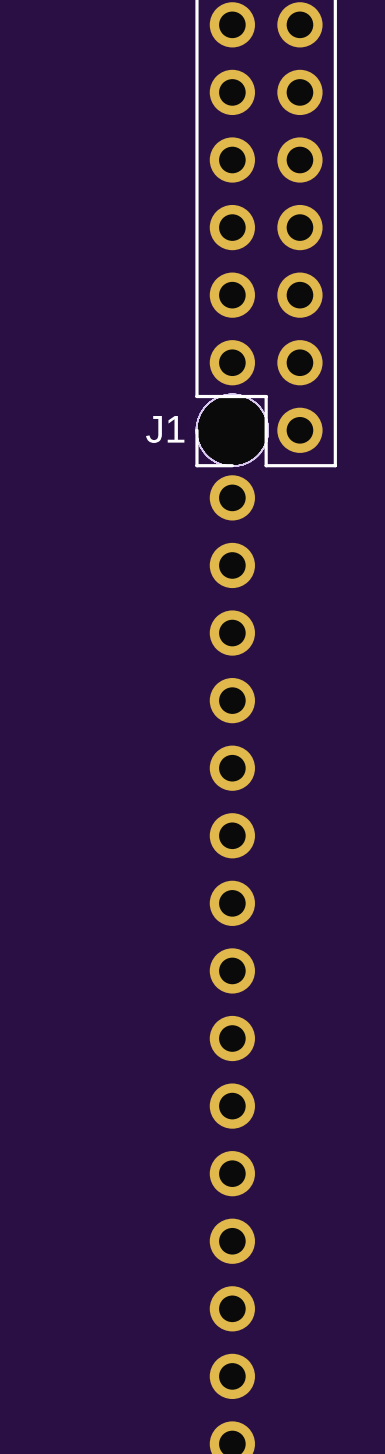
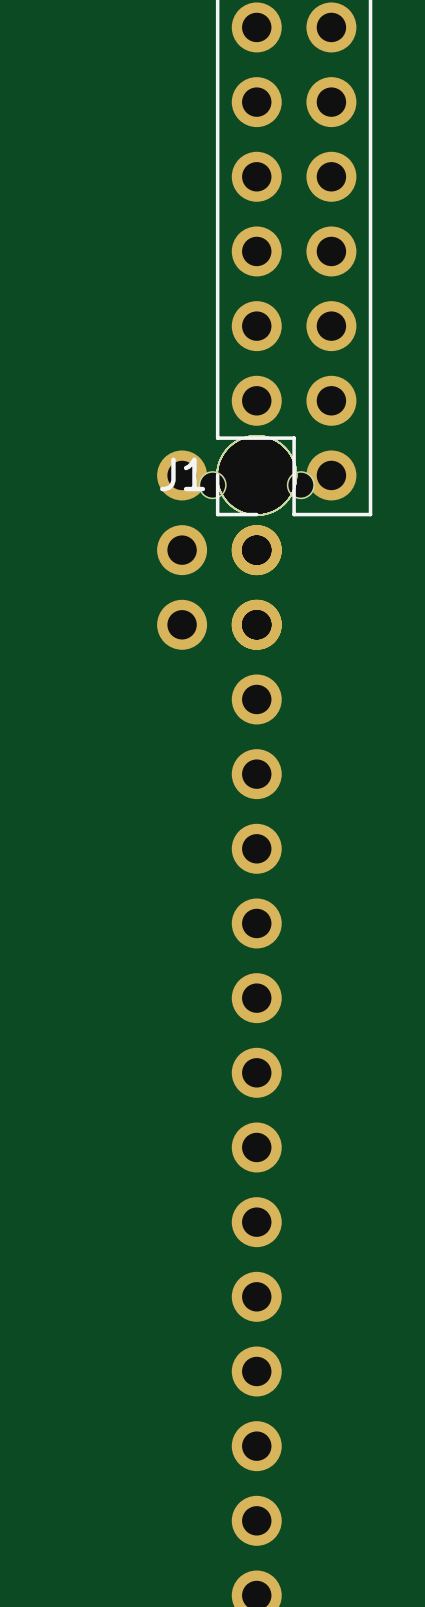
part: none -> (256, 485)
part: none -> (219, 550)

